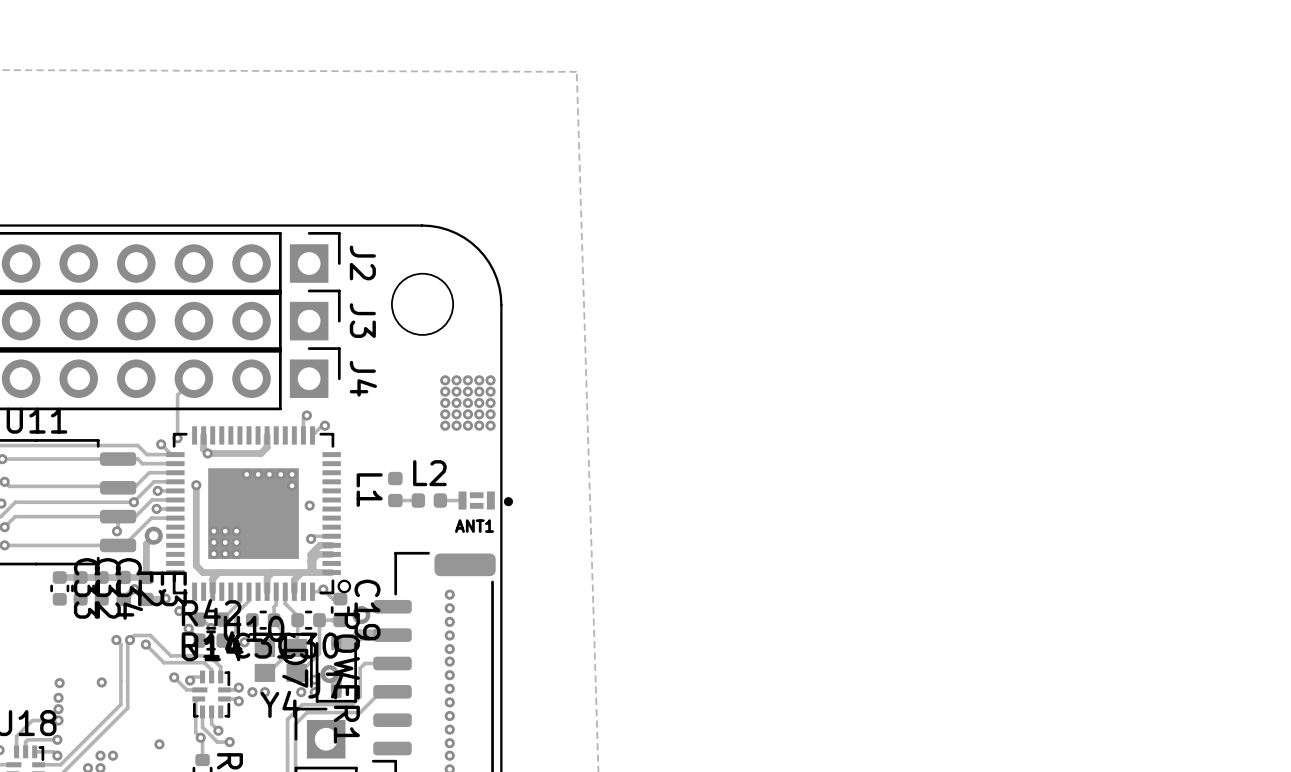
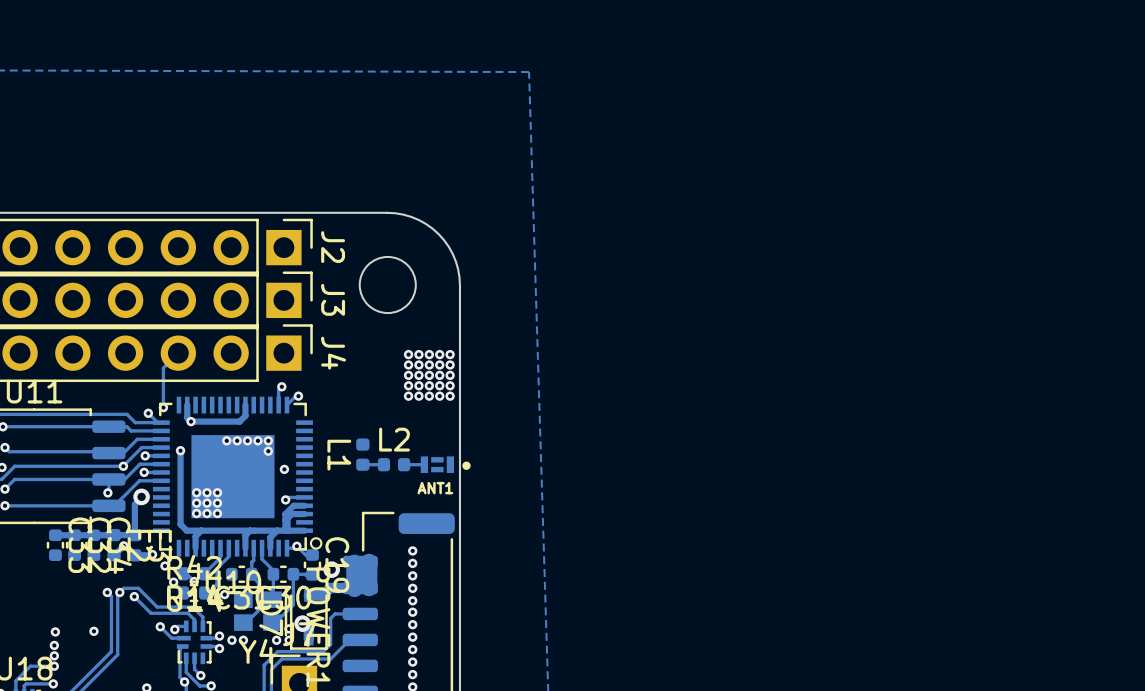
track: none -> (369, 562) (369, 588)
track: none -> (354, 562) (354, 588)

